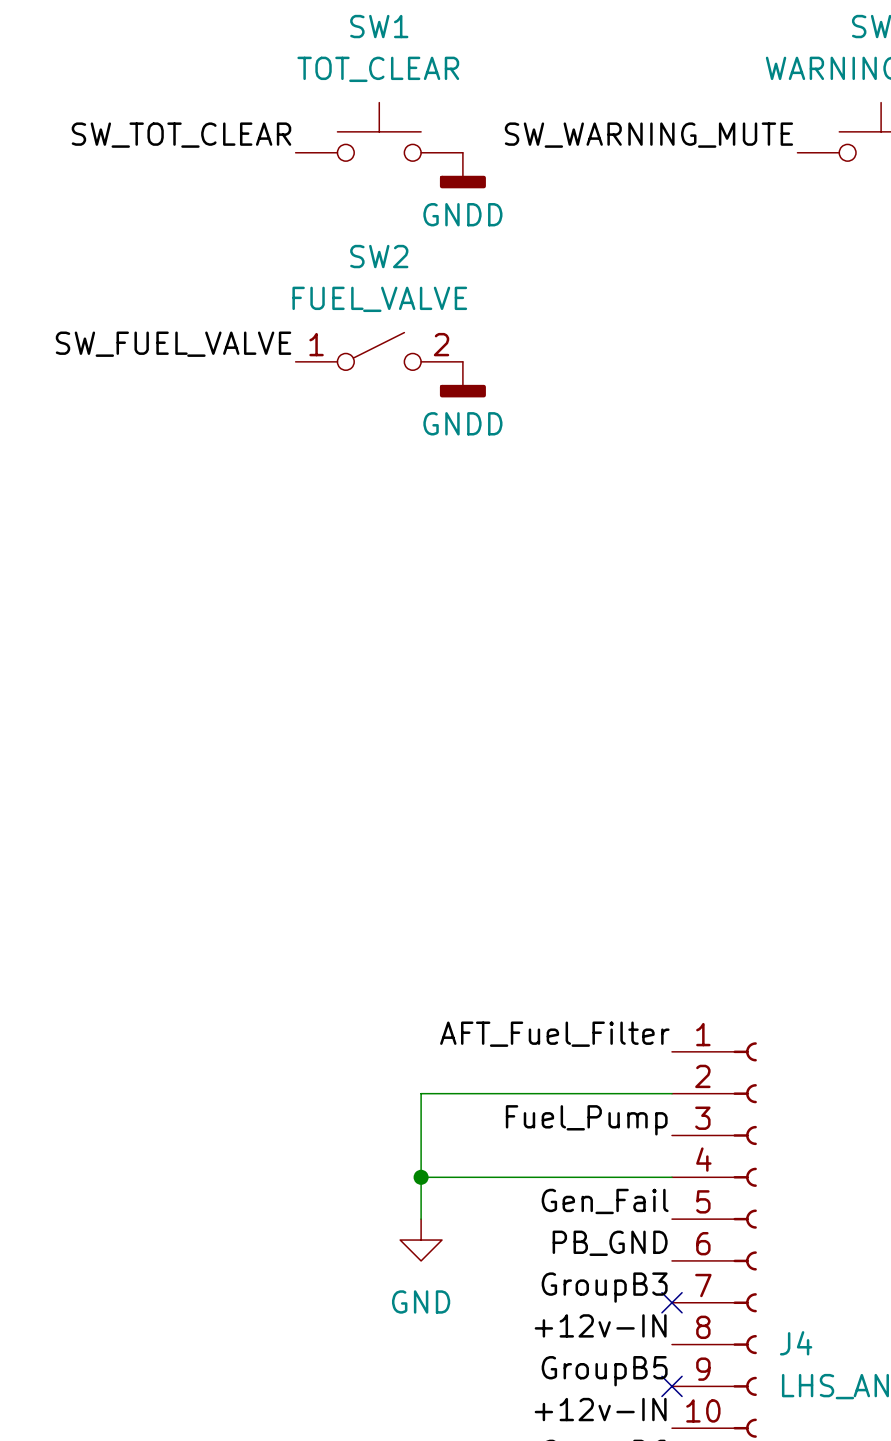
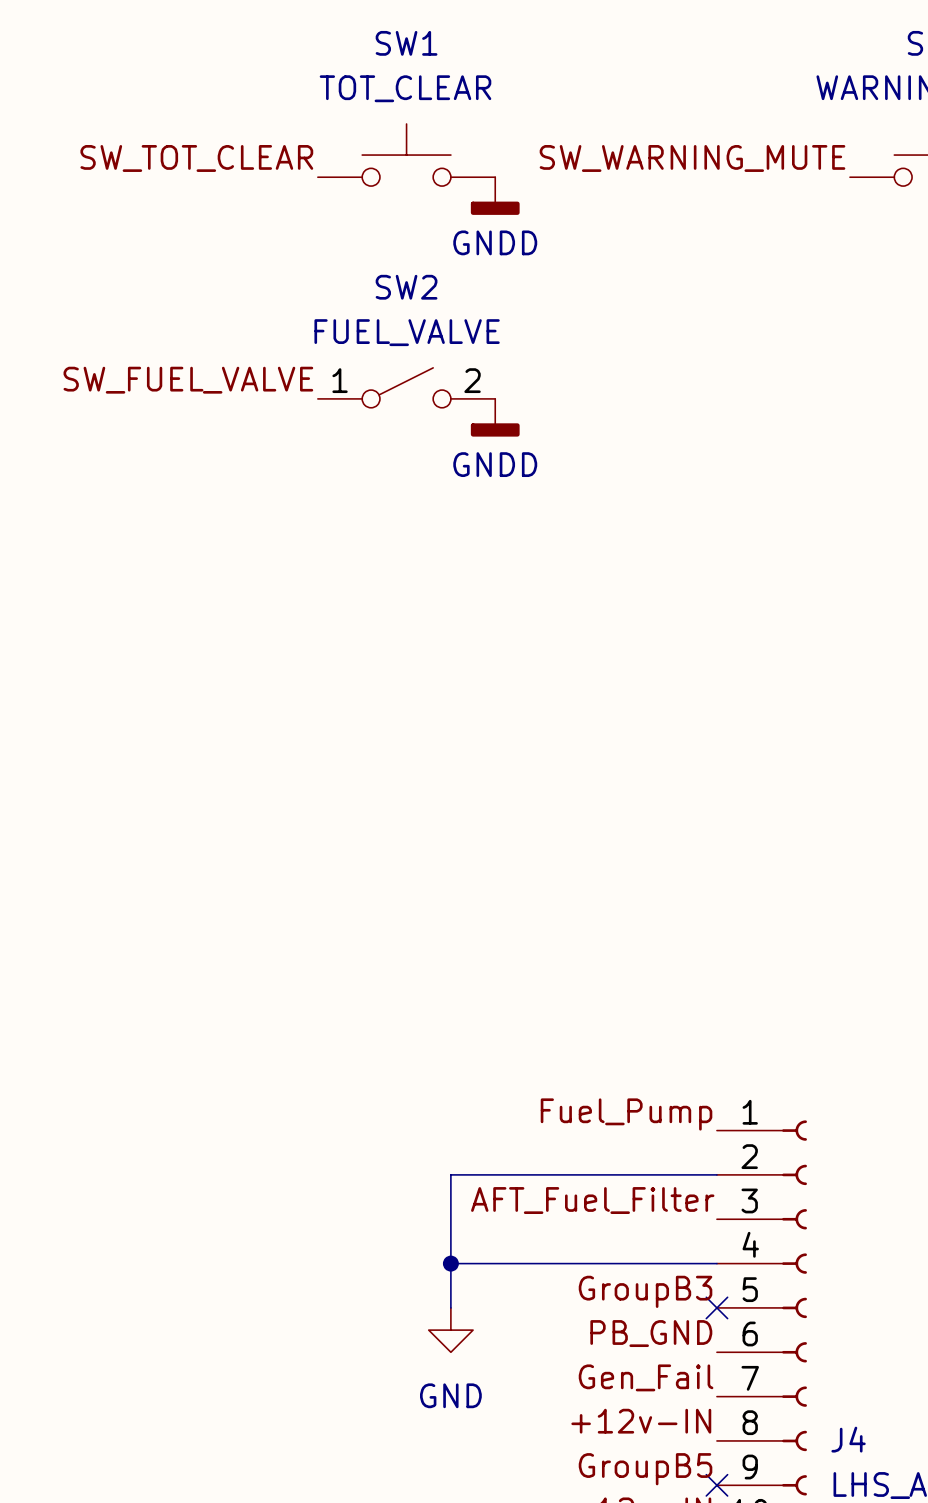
label: AFT_Fuel_Filter (554, 1034) -> Fuel_Pump (626, 1114)
label: Fuel_Pump (586, 1120) -> AFT_Fuel_Filter (592, 1200)
label: Gen_Fail (605, 1201) -> GroupB3 (645, 1291)
label: GroupB3 (604, 1287) -> Gen_Fail (646, 1377)
no-connect mark position: (672, 1302) -> (716, 1307)

